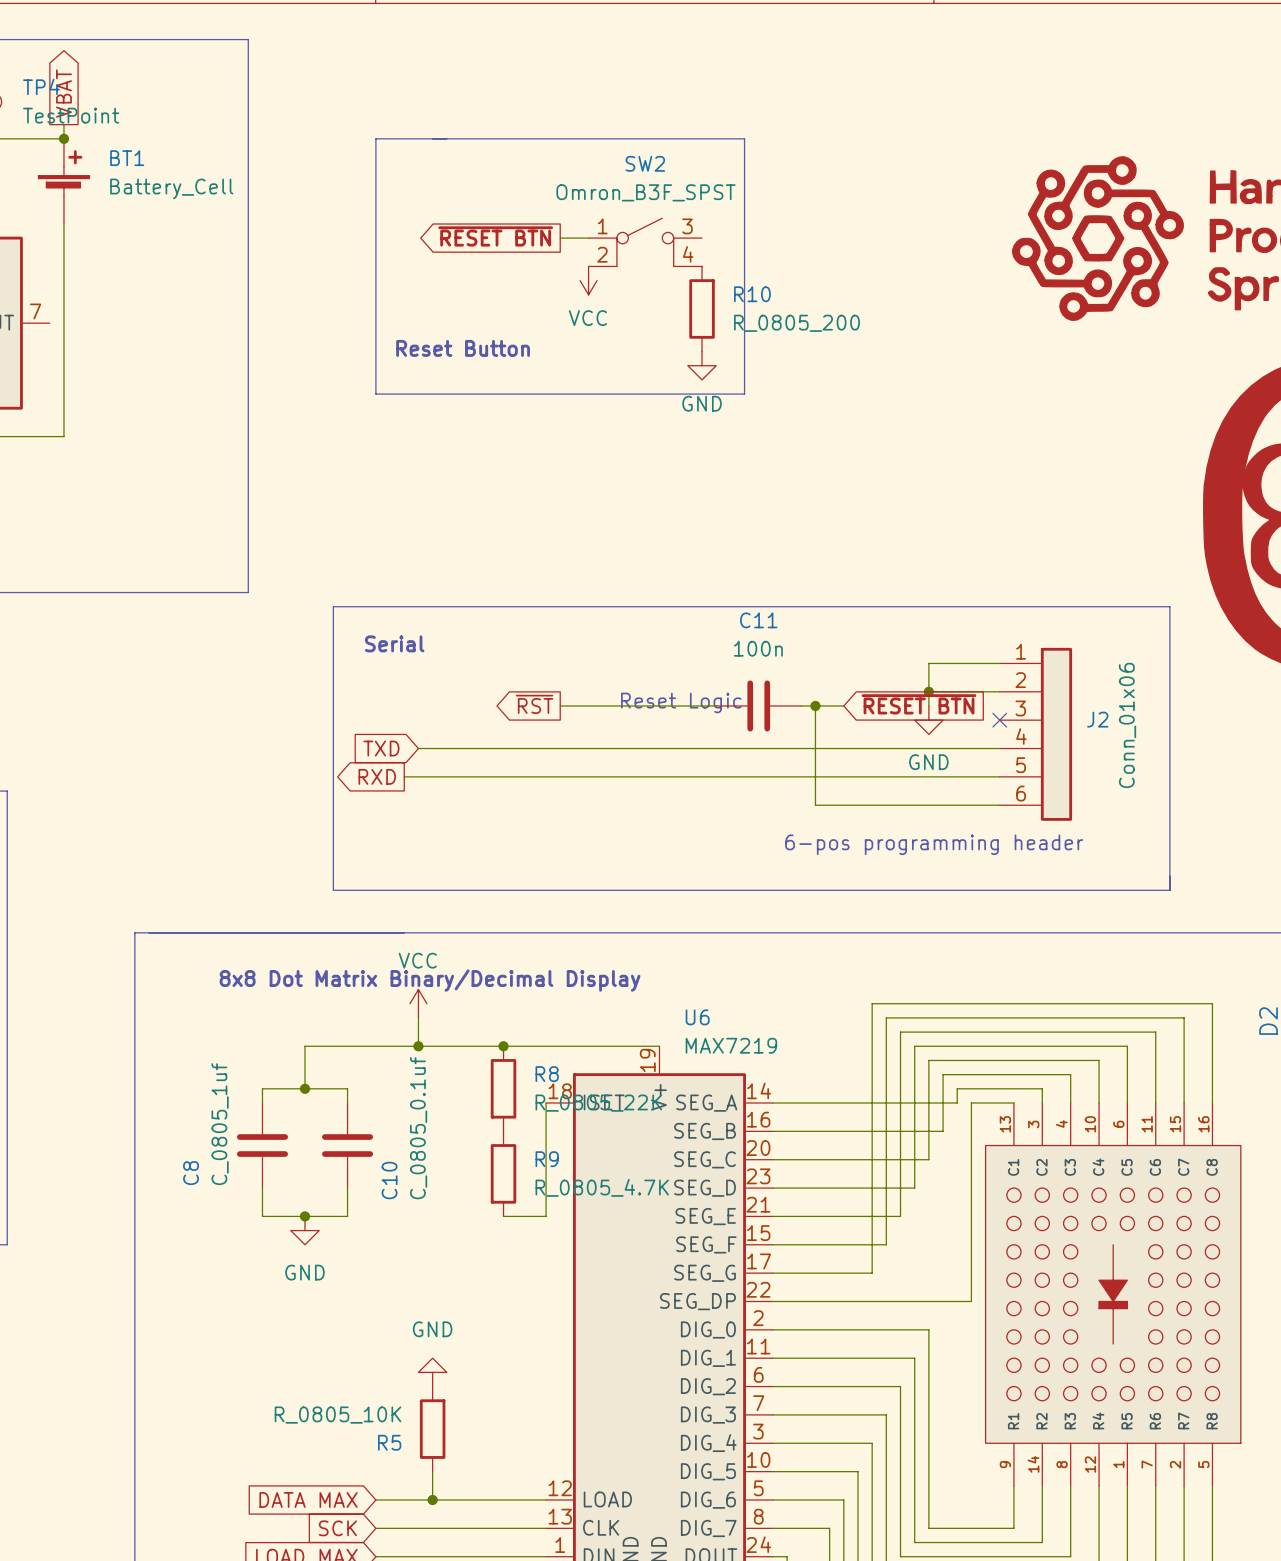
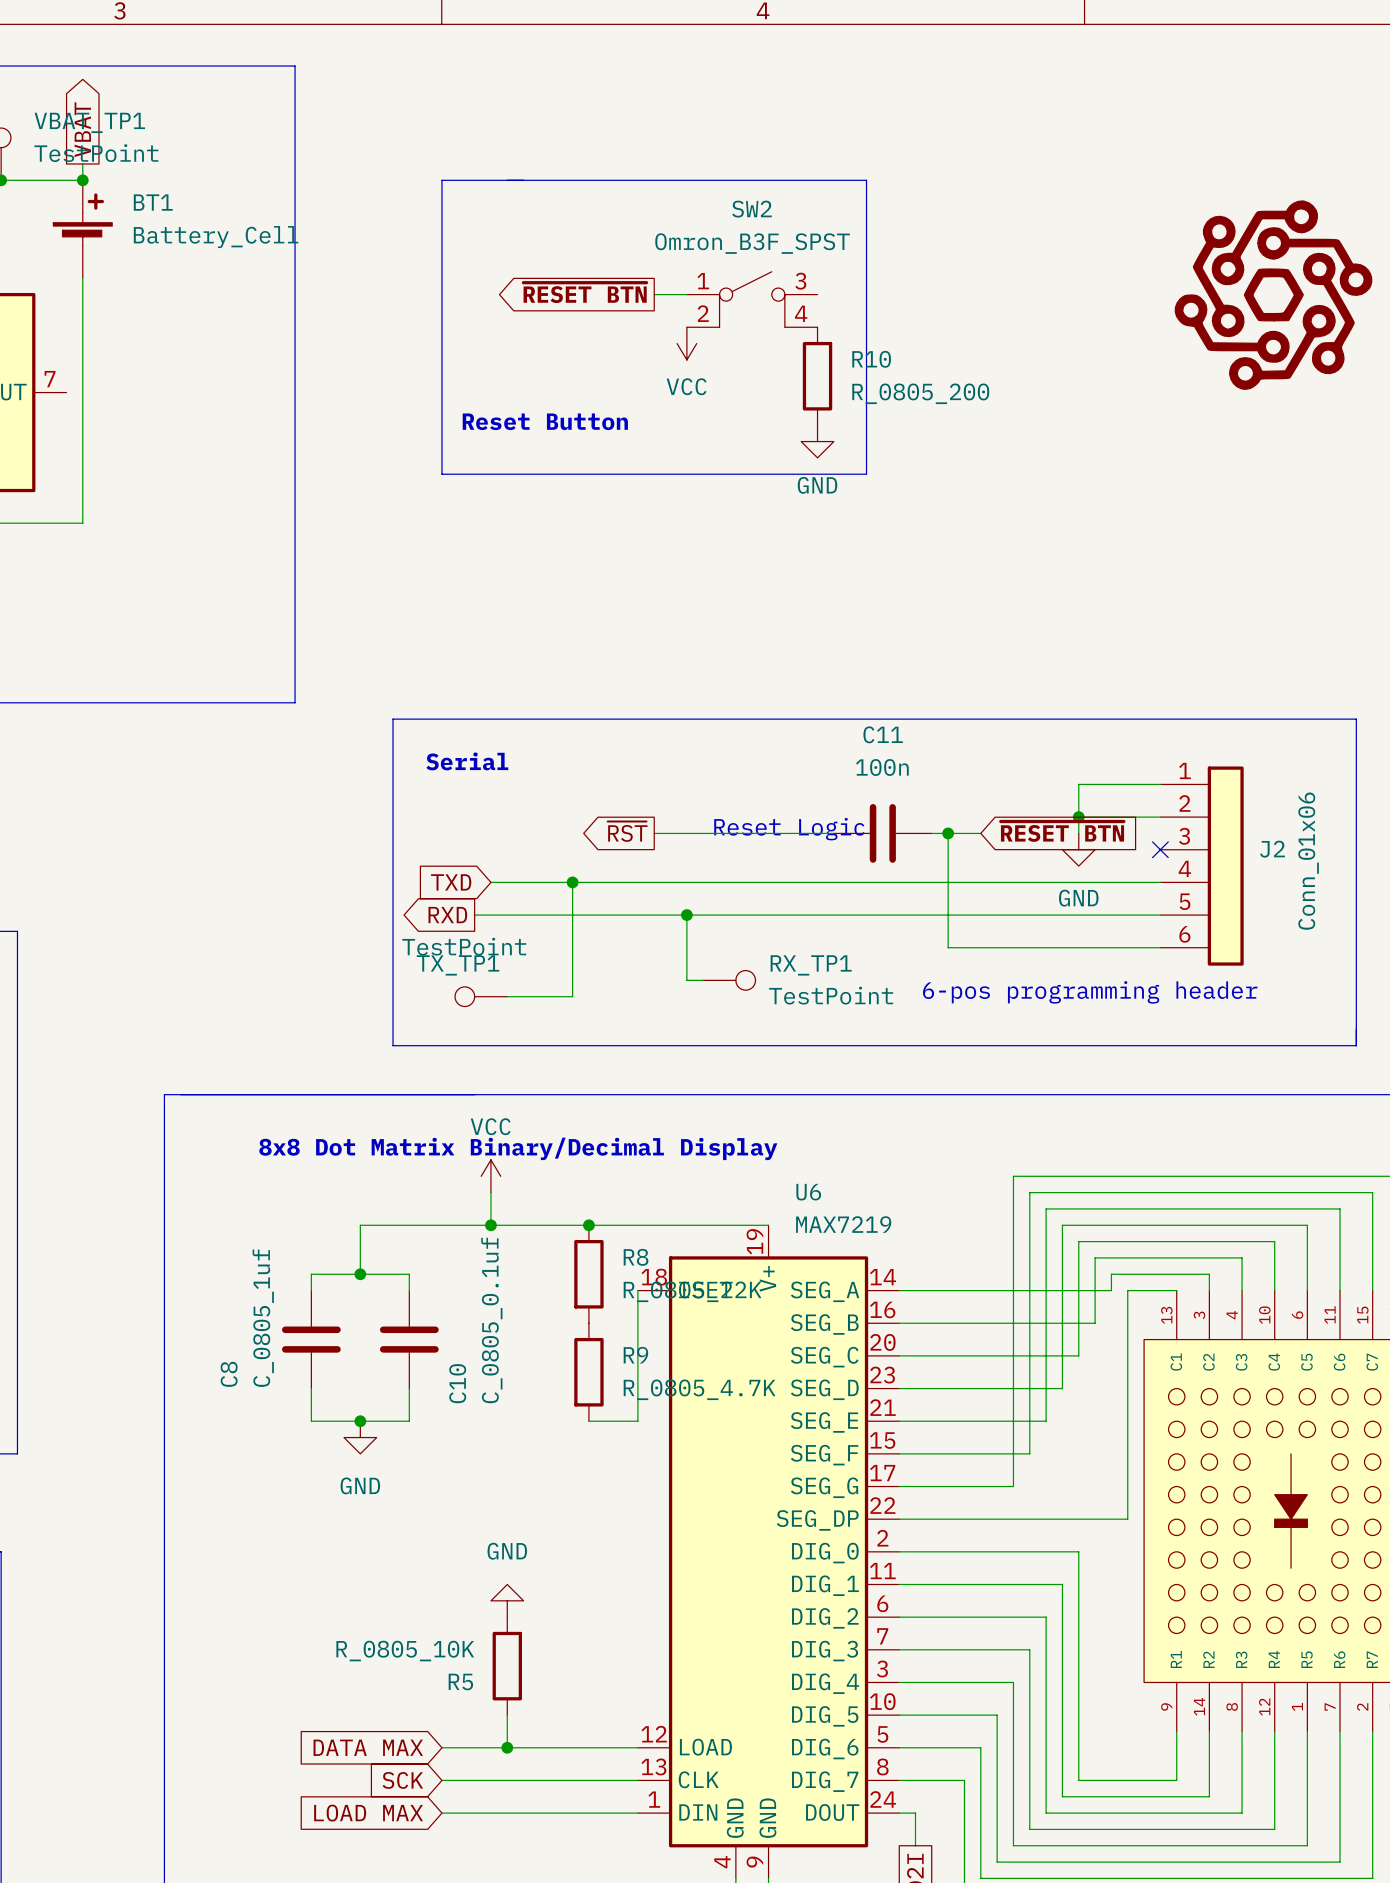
TP4 name: TP4 (41, 86) -> VBAT_TP1 (89, 122)
wire: none -> (572, 882) (572, 996) (507, 996)
junction: none -> (572, 882)
wire: none -> (686, 915) (686, 980) (703, 980)
junction: none -> (686, 915)
RX_TP1: none -> TestPoint (729, 980)
TX_TP1: none -> TestPoint (481, 996)

